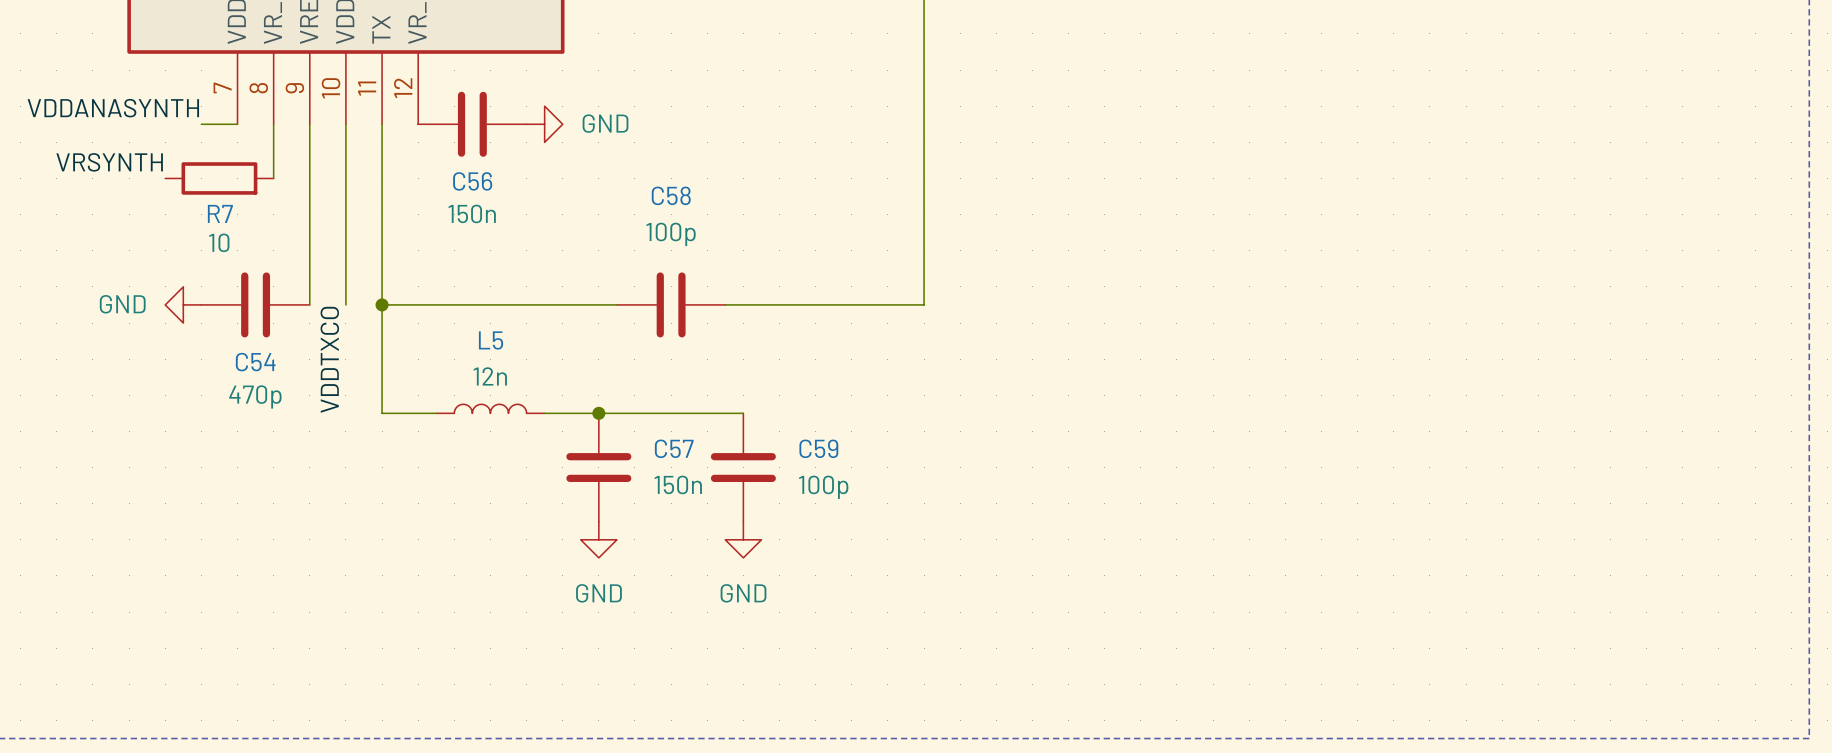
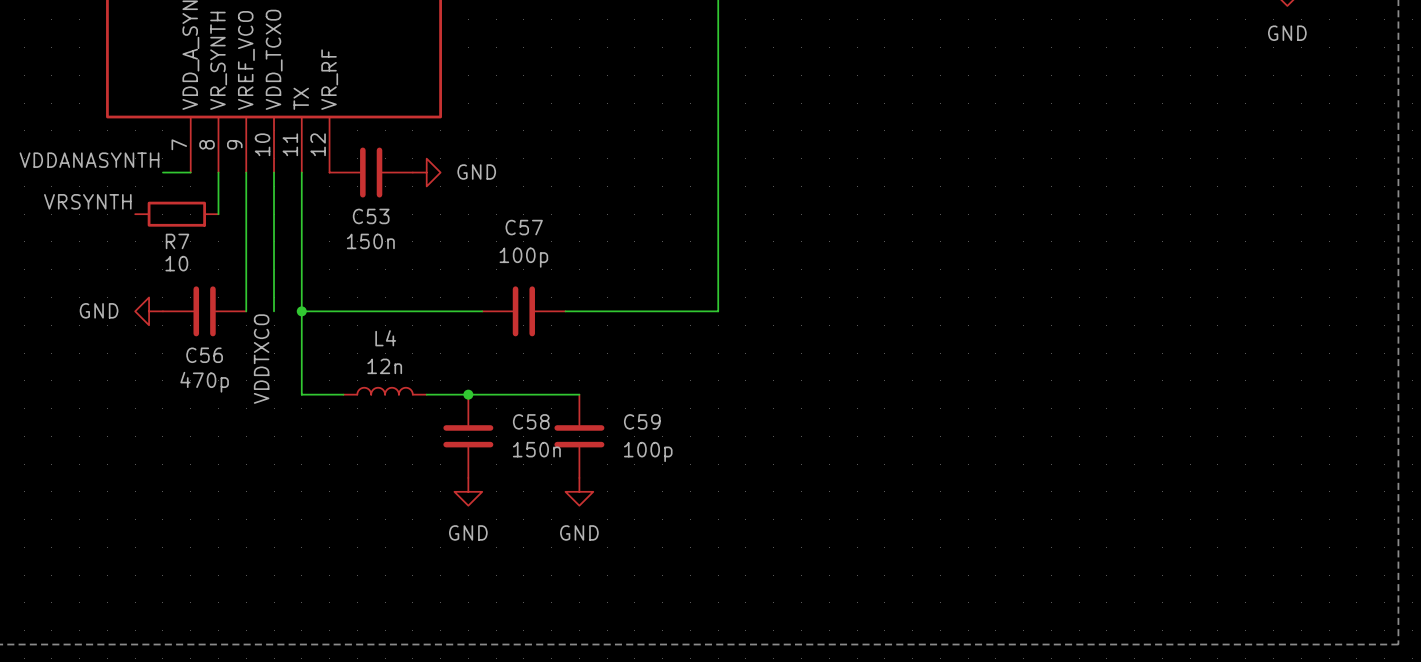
C56 name: C56 (472, 181) -> C53 (371, 216)
C58 name: C58 (671, 195) -> C57 (524, 227)
L5 name: L5 (491, 340) -> L4 (385, 338)
C54 name: C54 (255, 362) -> C56 (204, 355)
C57 name: C57 (674, 448) -> C58 (531, 421)

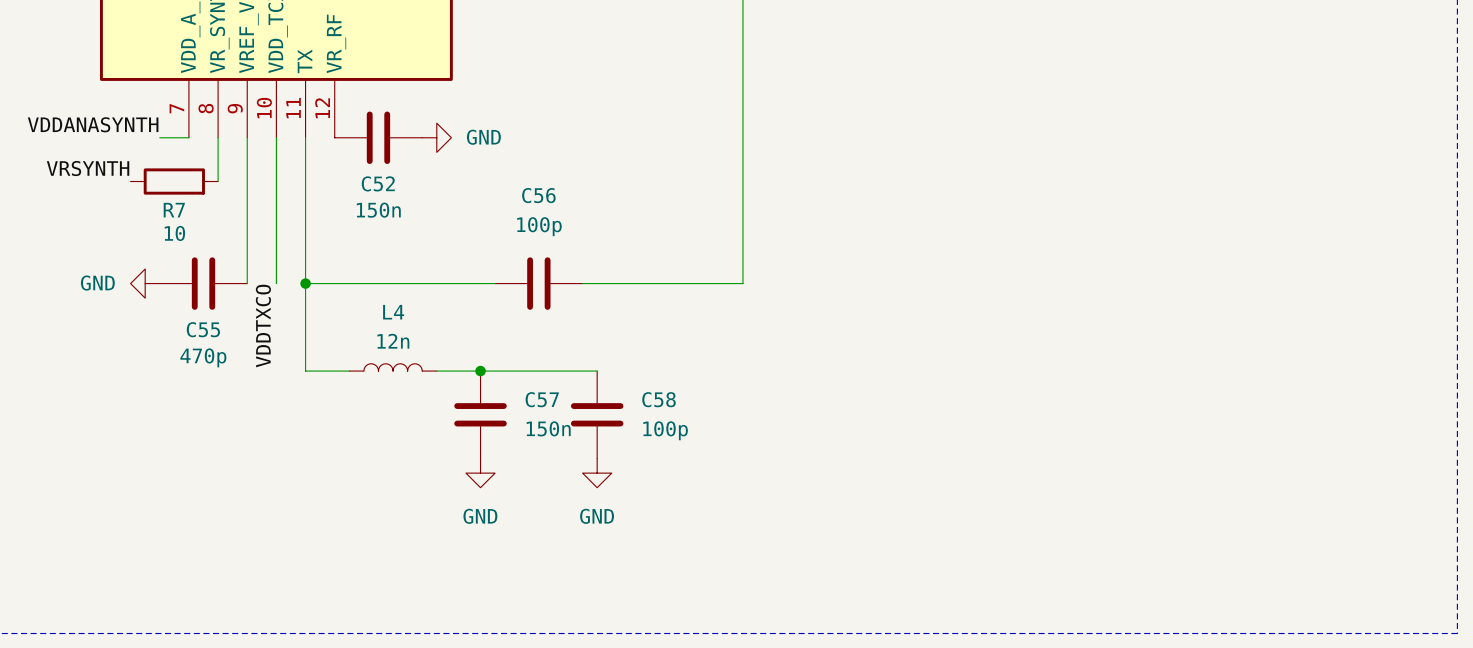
C53 name: C53 (371, 216) -> C52 (378, 183)
C57 name: C57 (524, 227) -> C56 (538, 195)
C56 name: C56 (204, 355) -> C55 (203, 329)
C58 name: C58 (531, 421) -> C57 (542, 399)
C59 name: C59 (642, 421) -> C58 (659, 399)

